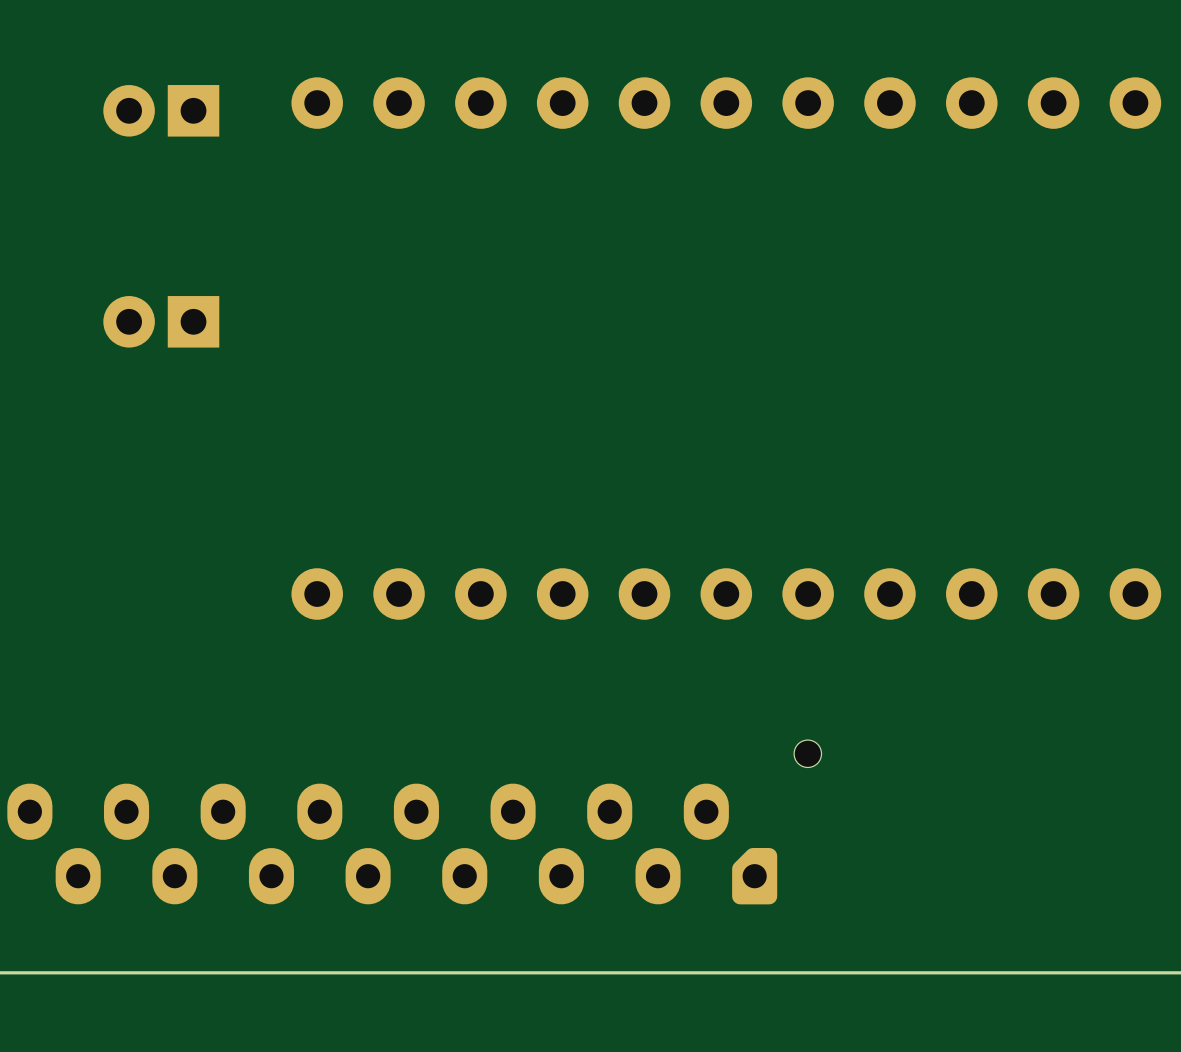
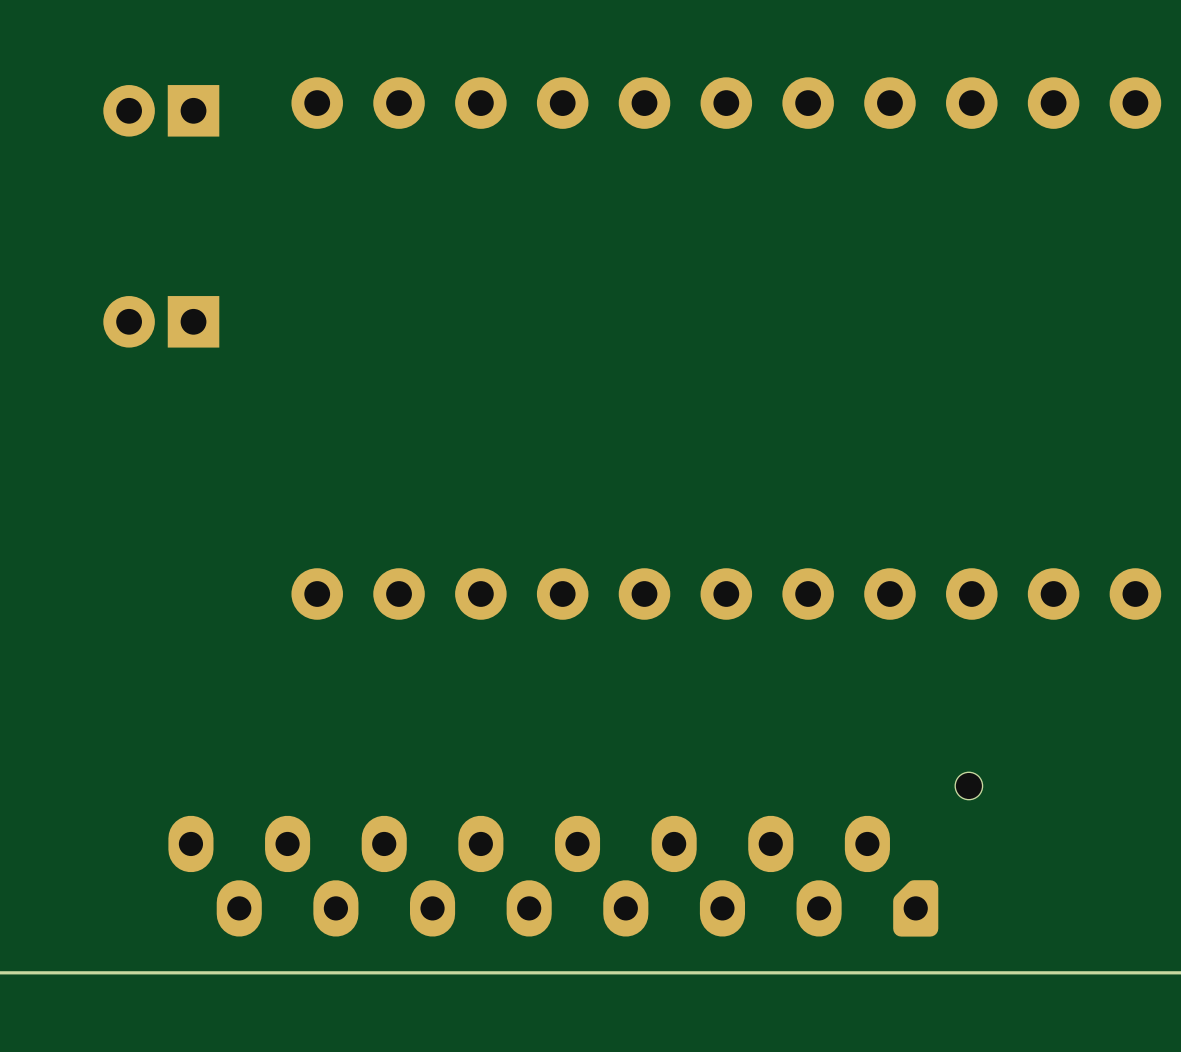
part position: (414, 822) -> (575, 854)

